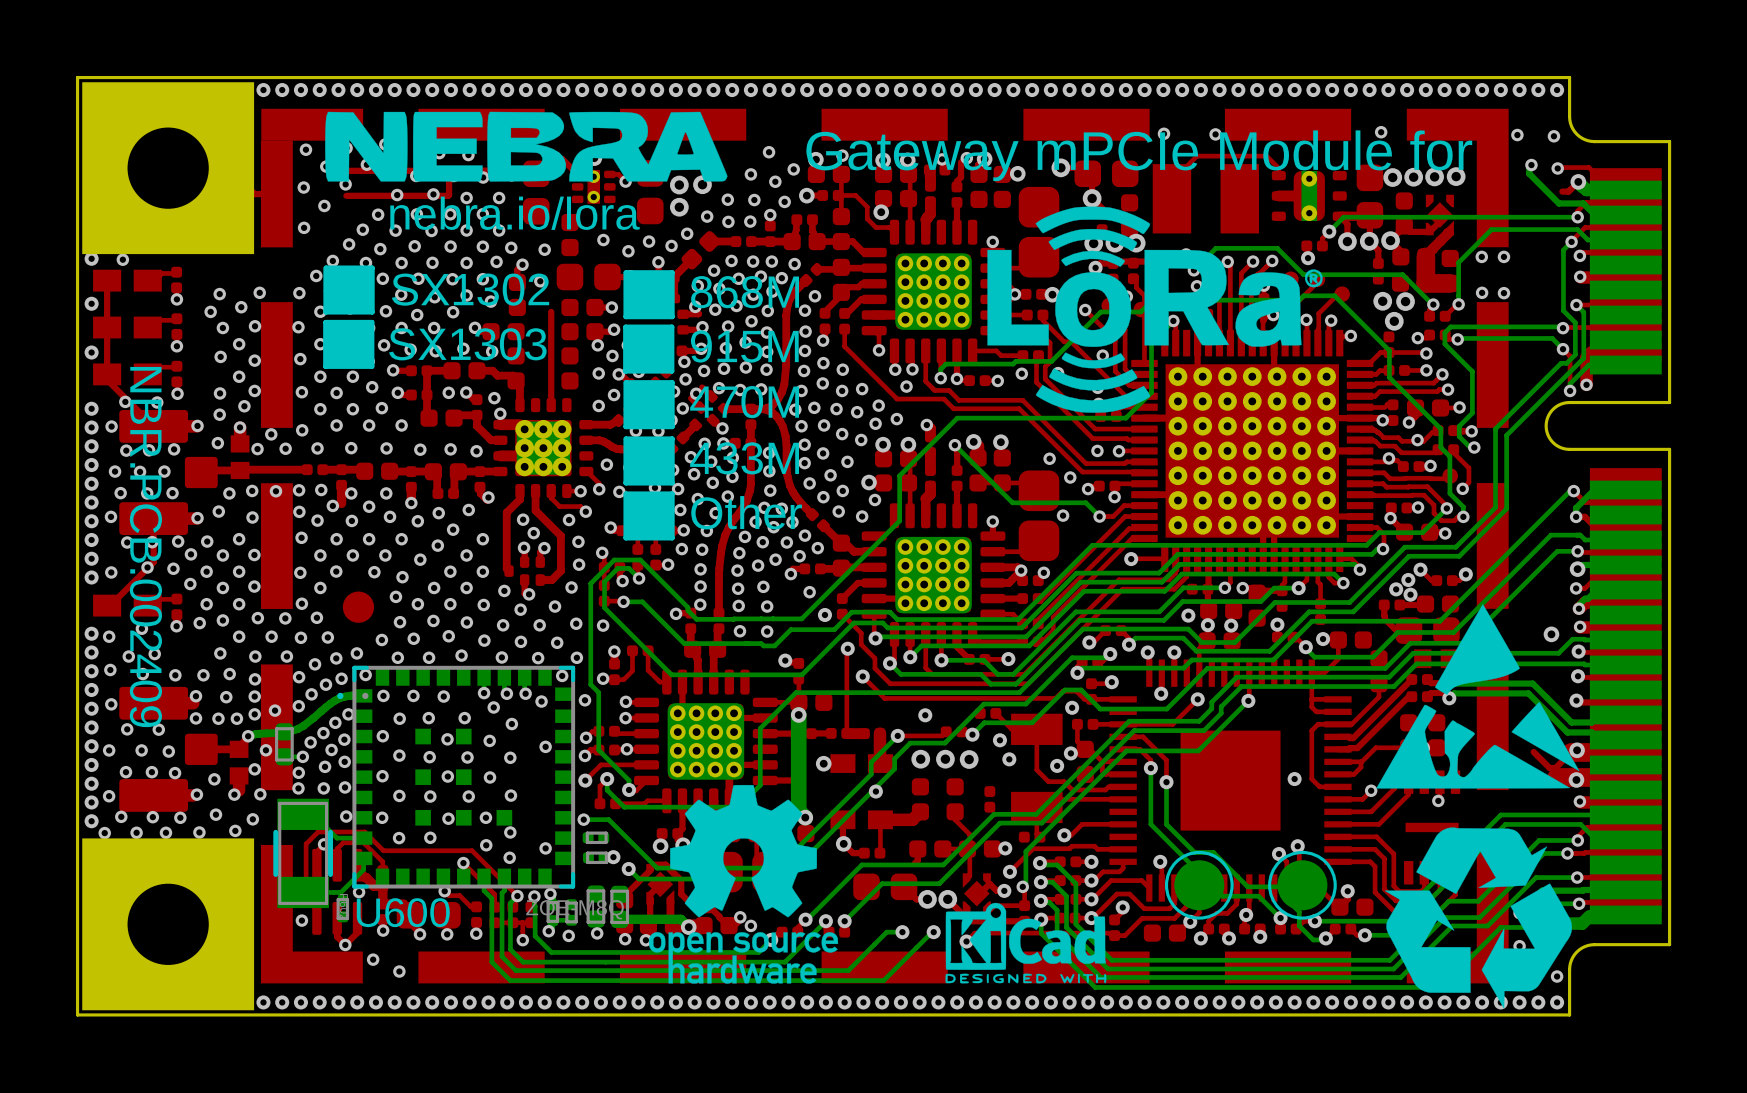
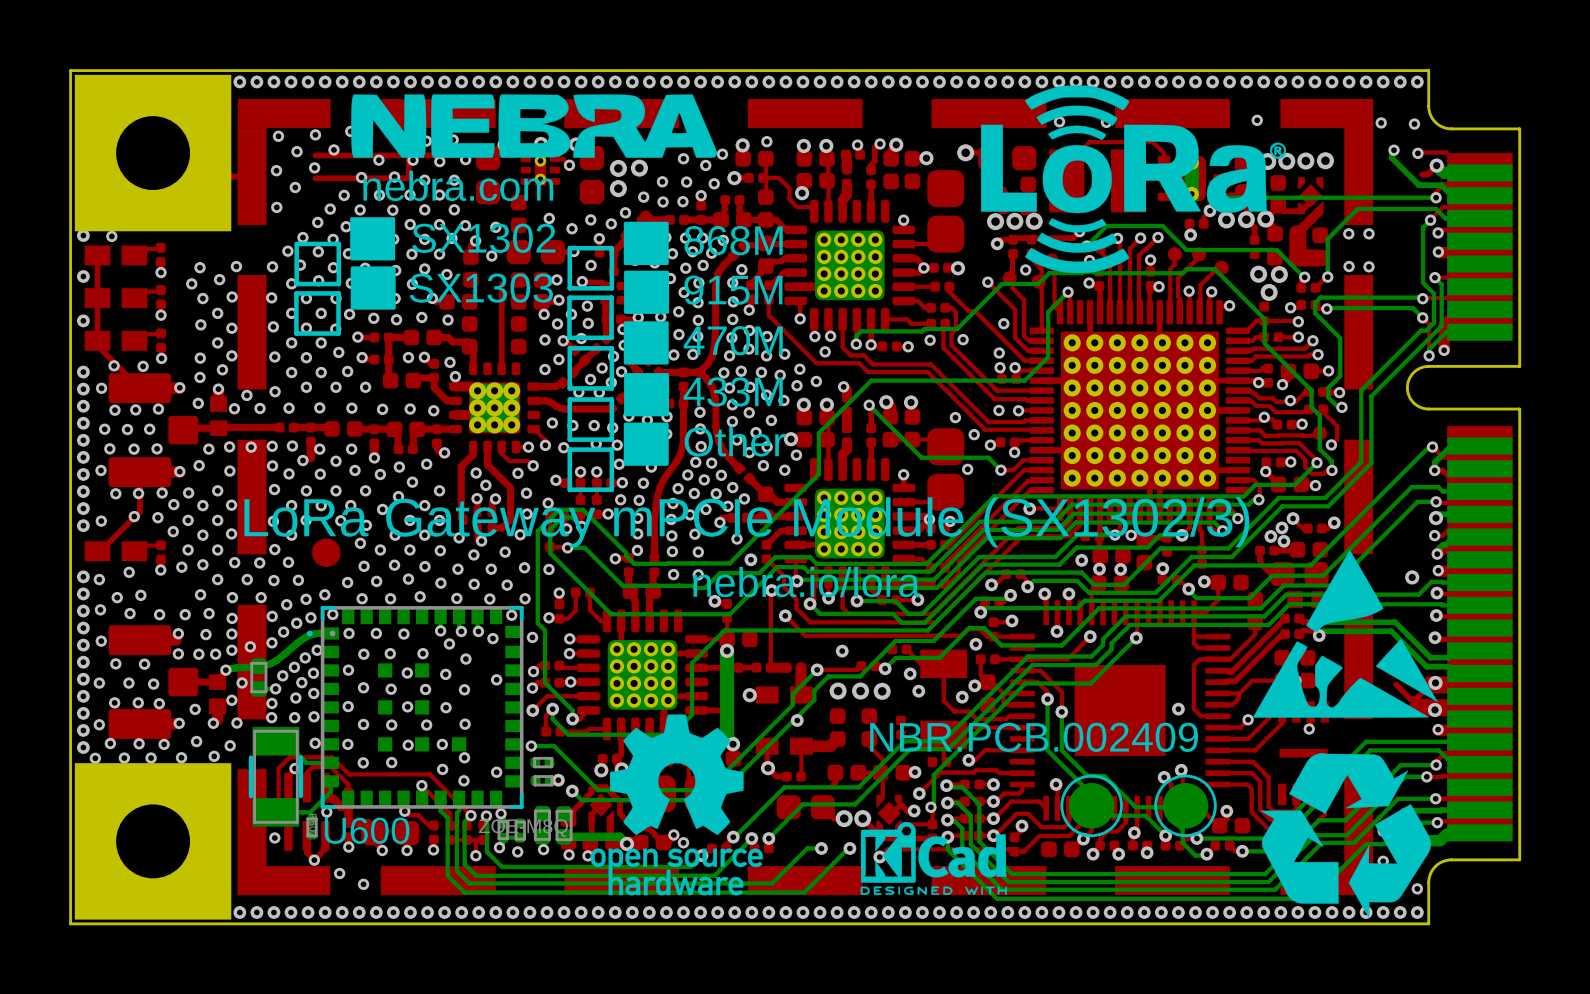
drawing position: (526, 146) -> (534, 126)
text: Gateway mPCIe Module for (1139, 155) -> none
text: none -> nebra.com (458, 185)
text position: nebra.io/lora (514, 213) -> nebra.io/lora (806, 582)
drawing: none -> [350, 217, 396, 310]
drawing: none -> [623, 221, 670, 466]
drawing: [323, 266, 374, 368] -> none
drawing: [624, 271, 675, 540] -> none
text position: SX1302 (470, 289) -> SX1302 (483, 238)
text position: 868M (745, 292) -> 868M (733, 240)
drawing position: (1155, 309) -> (1133, 179)
text position: SX1303 (467, 344) -> SX1303 (481, 288)
text position: 915M (744, 346) -> 915M (733, 290)
text position: 470M (744, 402) -> 470M (733, 340)
text position: 433M (744, 458) -> 433M (733, 391)
text position: Other (746, 512) -> Other (735, 441)
text: NBR.PCB.002409 (145, 547) -> none
text: none -> LoRa Gateway mPCIe Module (SX1302/3) (746, 522)
text: none -> NBR.PCB.002409 (1034, 737)

